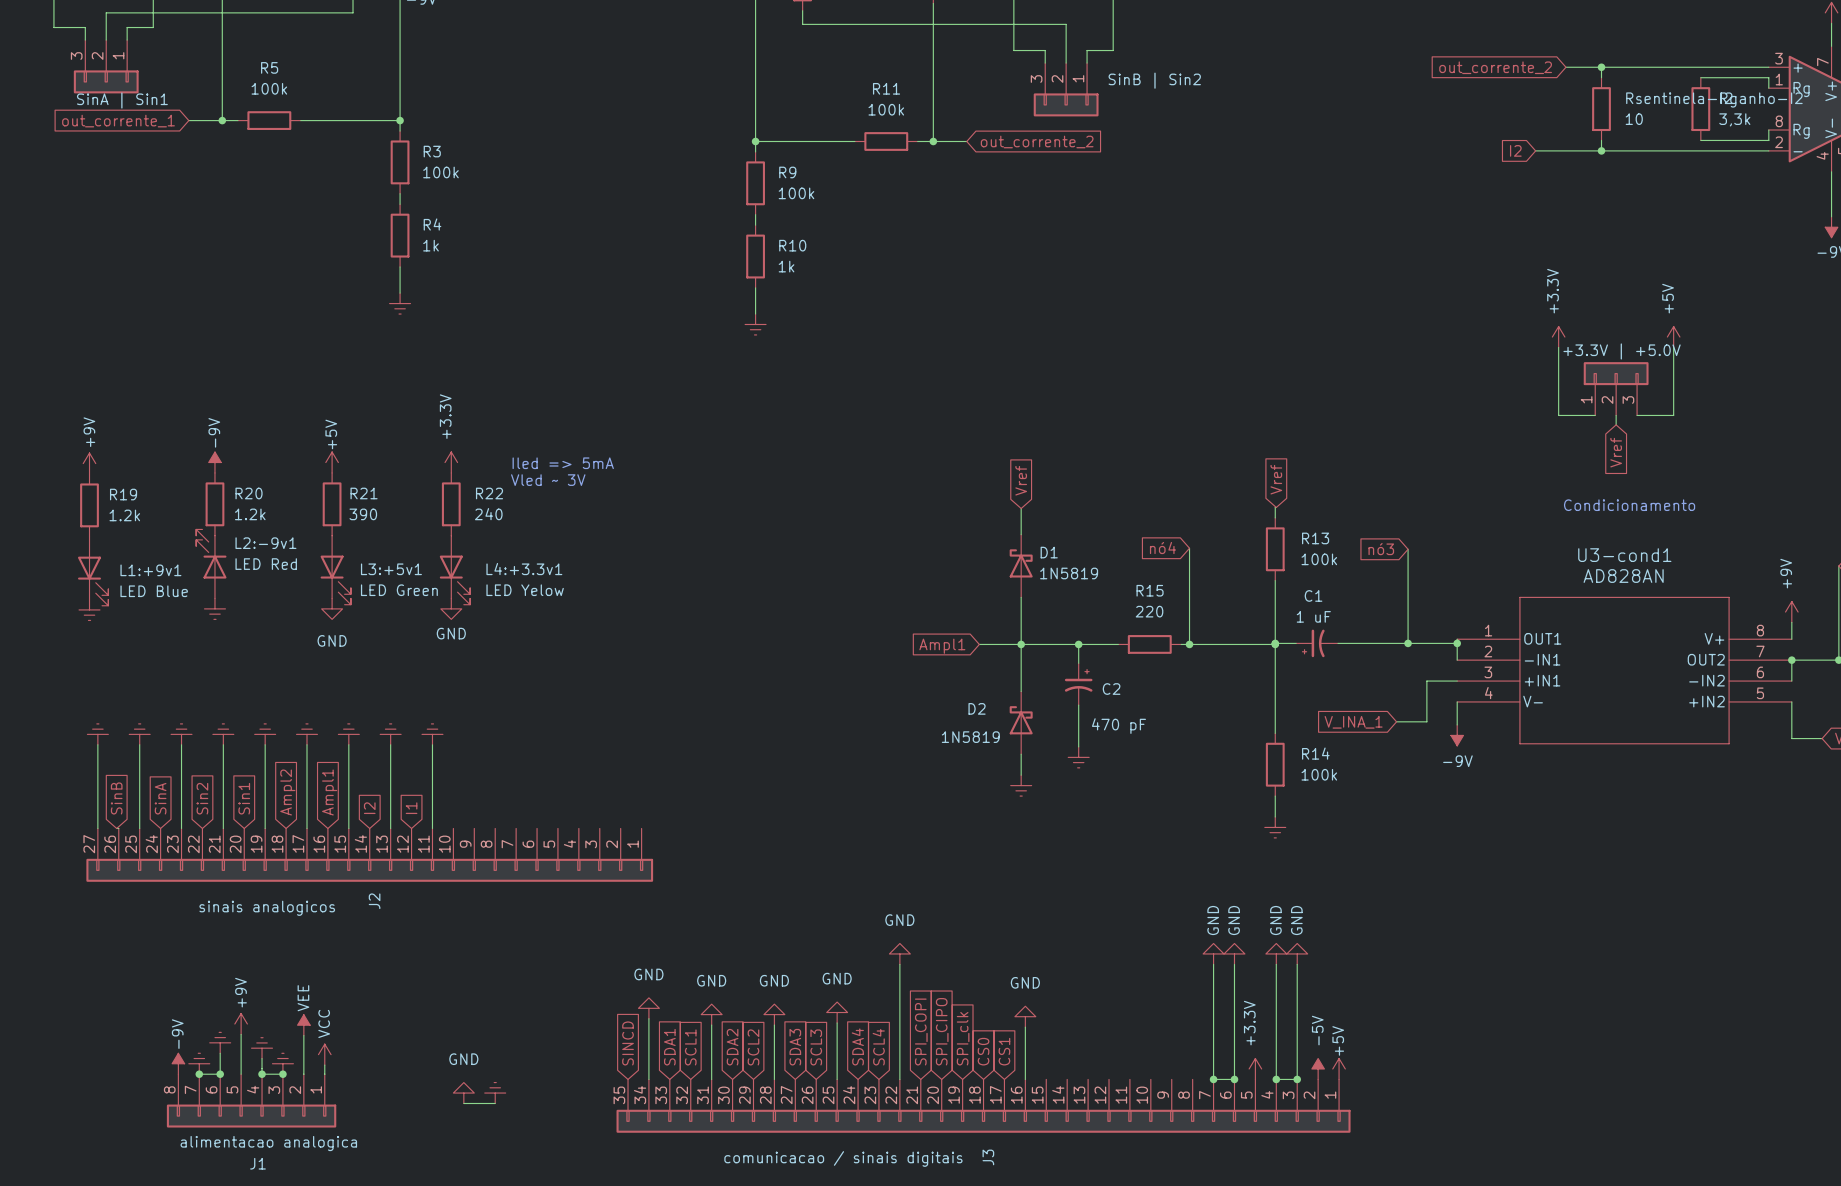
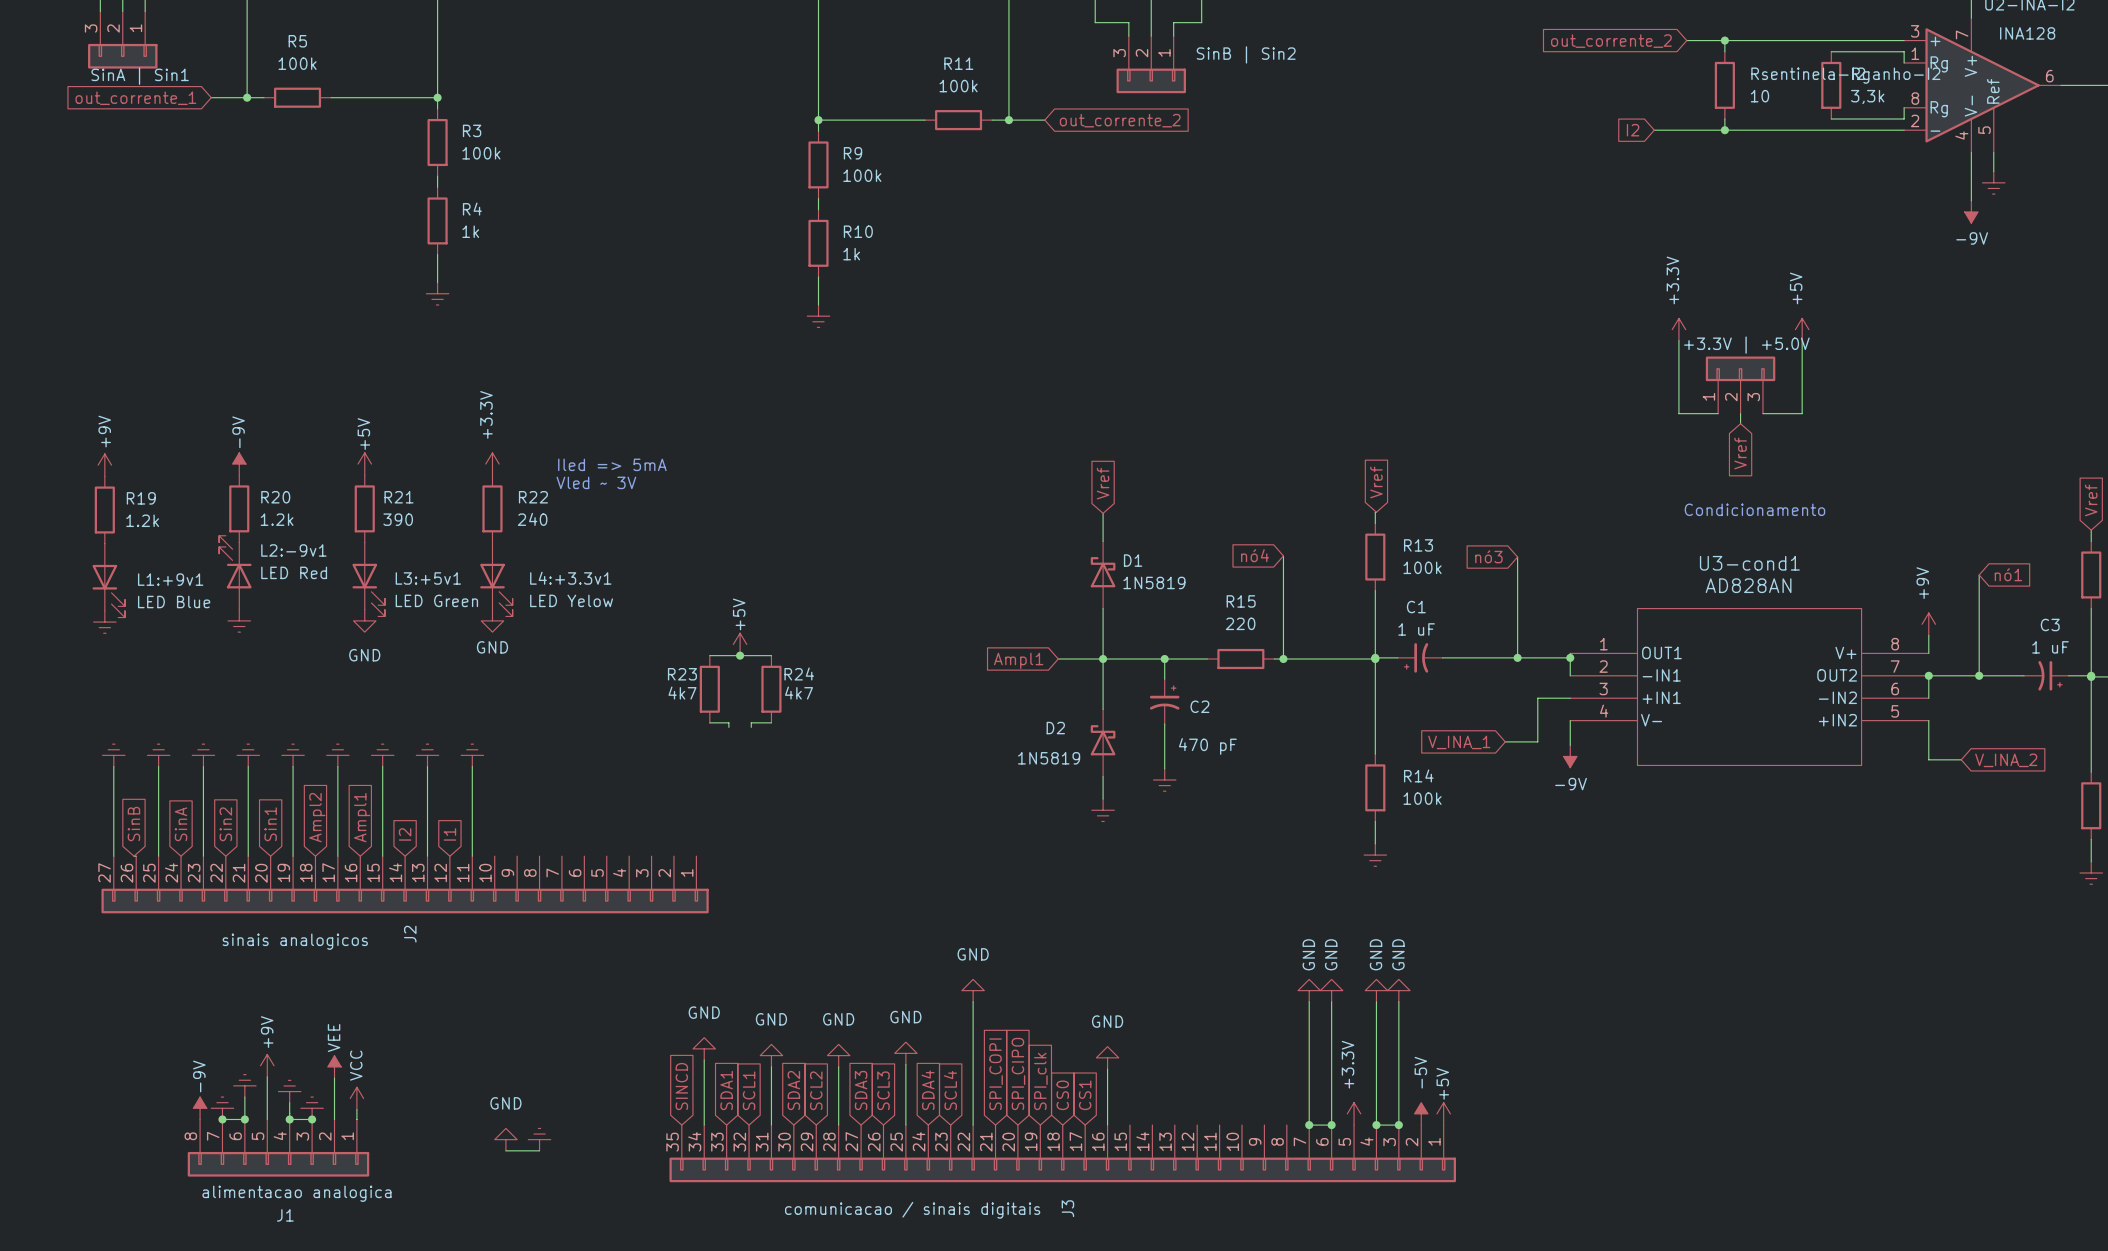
power symbol: none -> +5V (740, 644)
wire: none -> (709, 655) (771, 655)
junction: none -> (740, 655)
R23: none -> 4k7 (709, 689)
R24: none -> 4k7 (771, 689)
wire: none -> (709, 722) (728, 722) (728, 727)
wire: none -> (771, 722) (751, 722) (751, 727)

